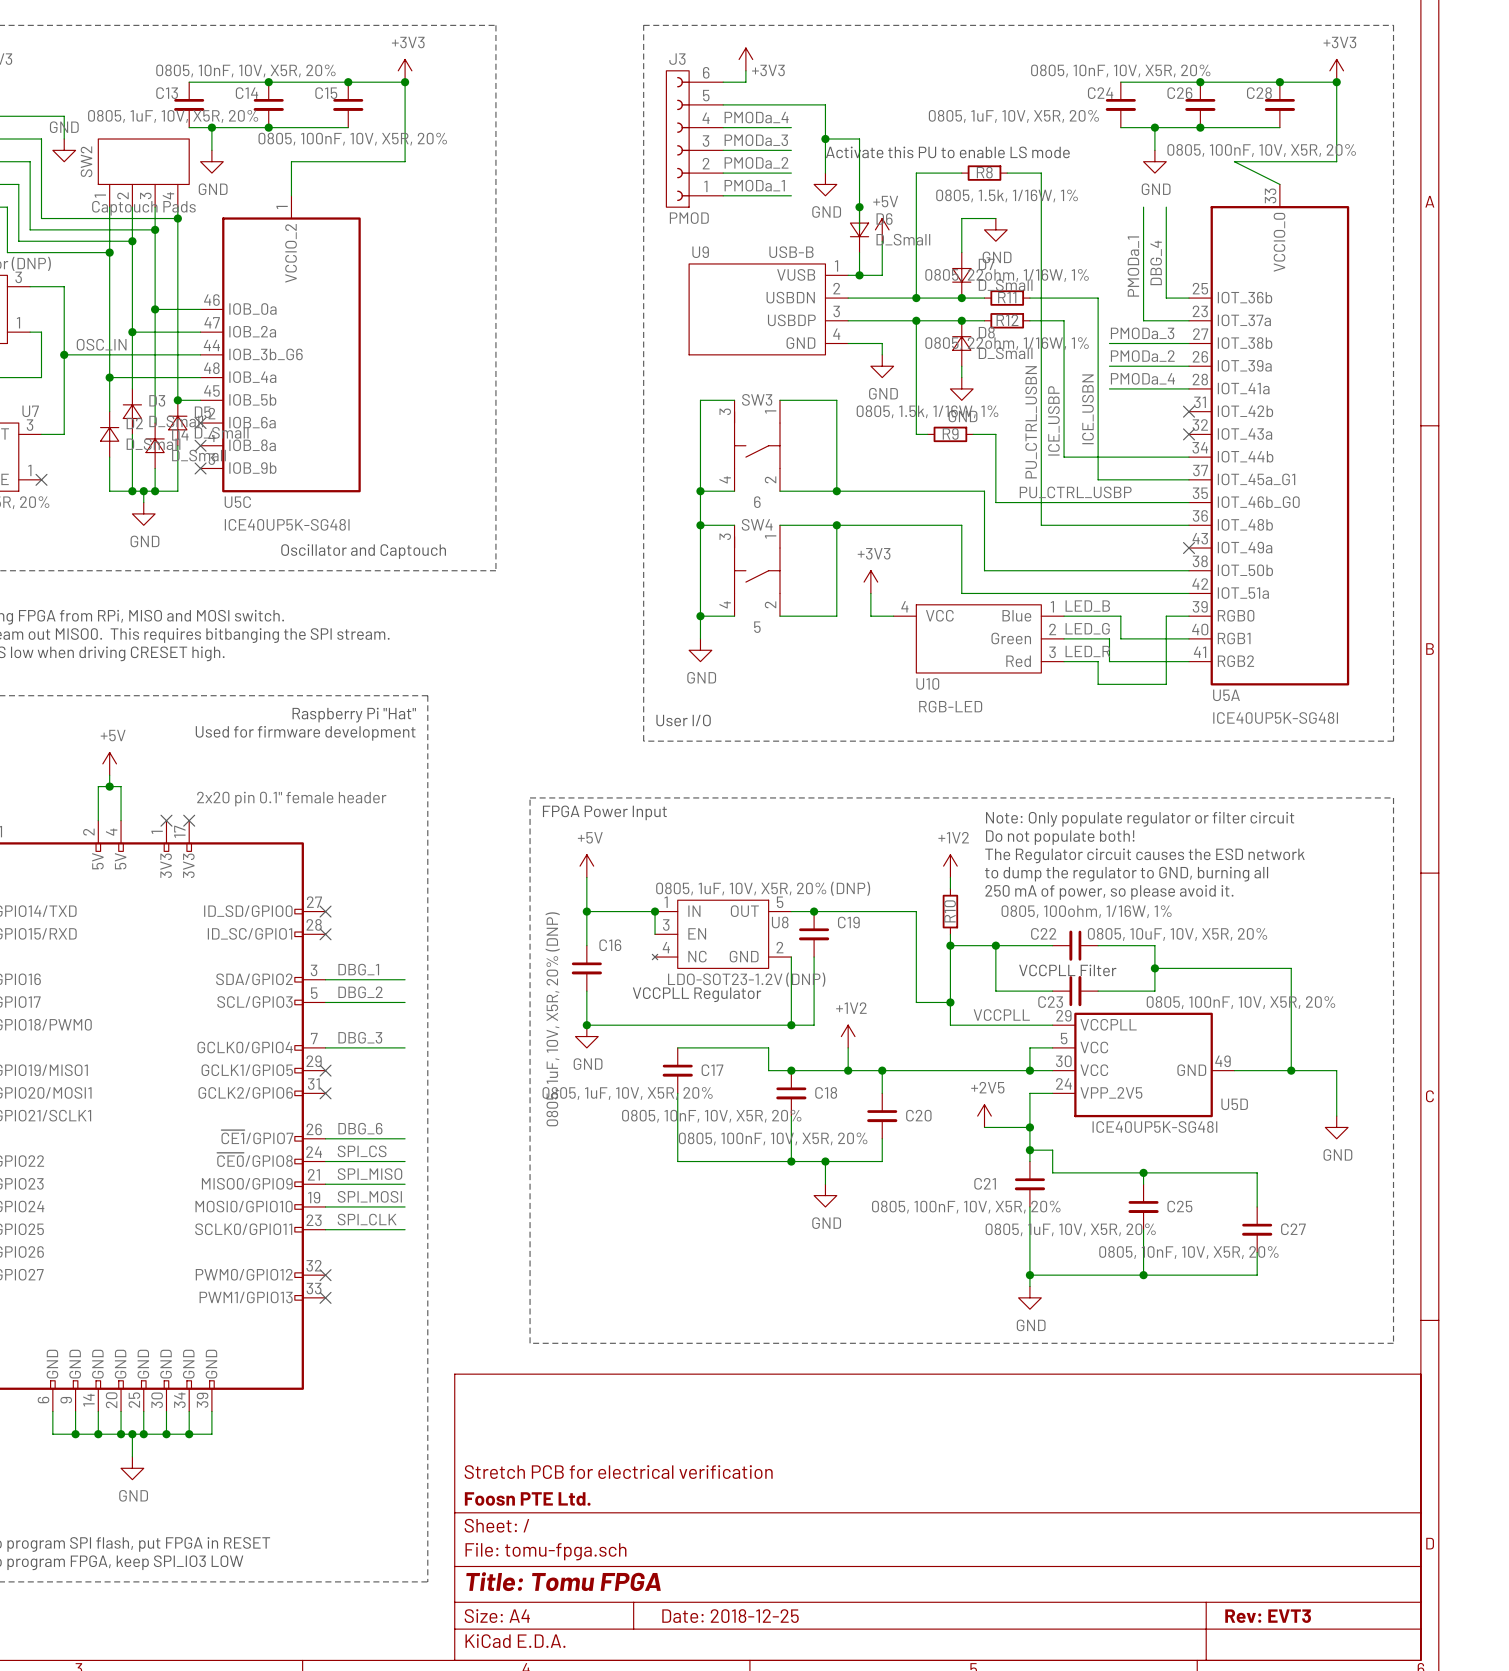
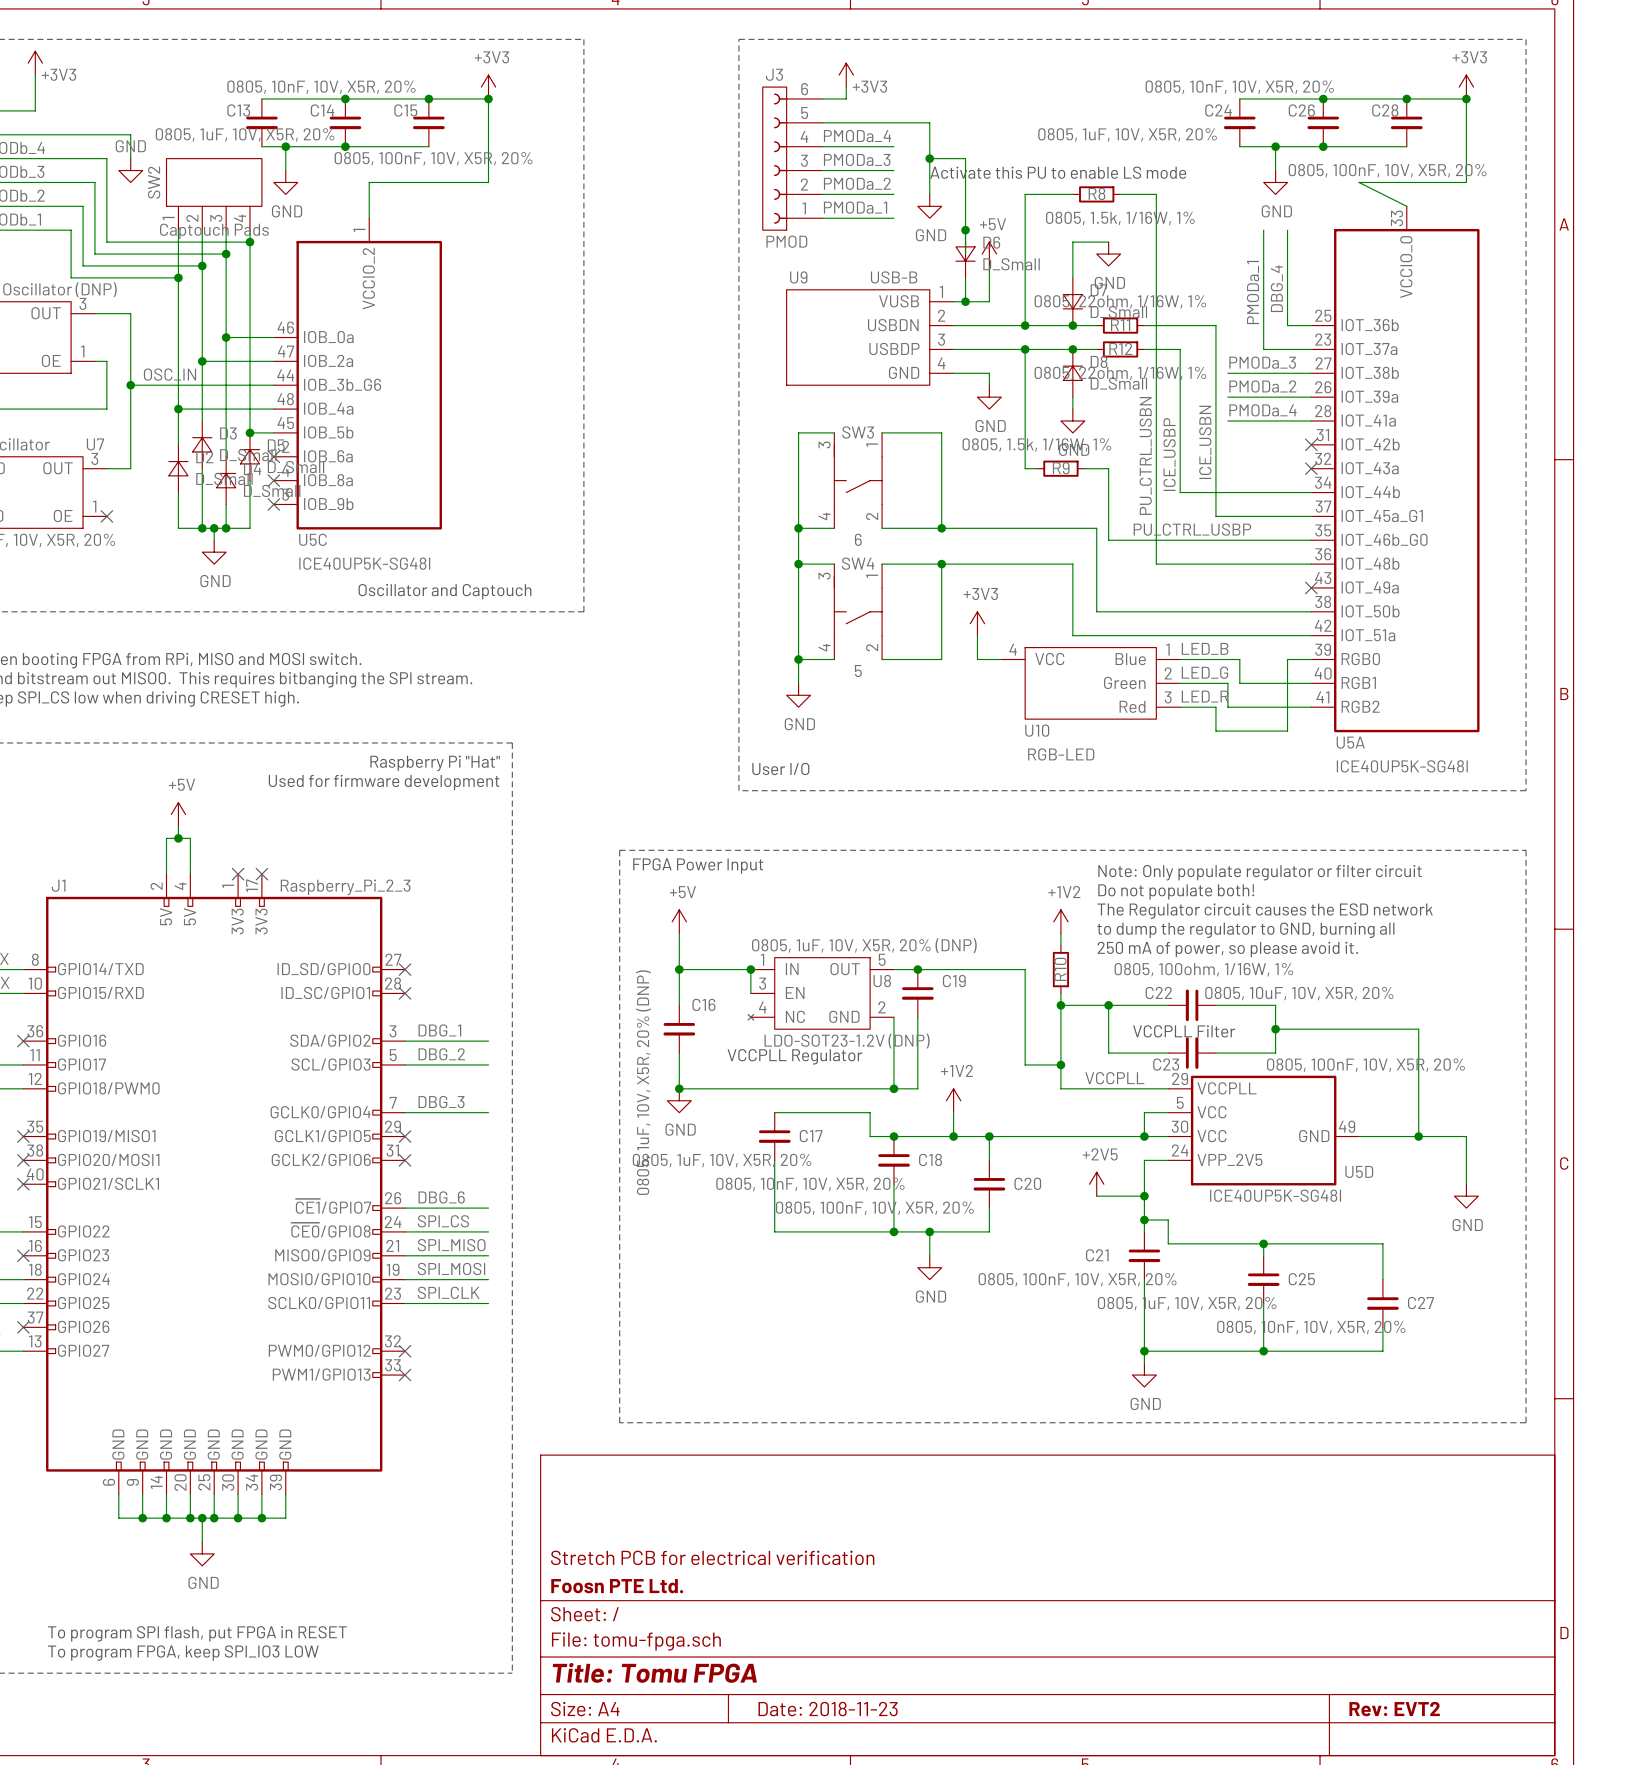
J1 value: 2x20 pin 0.1" female header (291, 799) -> Raspberry_Pi_2_3 (345, 887)
title block: Date: 2018-12-25 (730, 1616) -> Date: 2018-11-23 (828, 1709)
title block: Rev: EVT3 (1268, 1616) -> Rev: EVT2 (1394, 1709)

